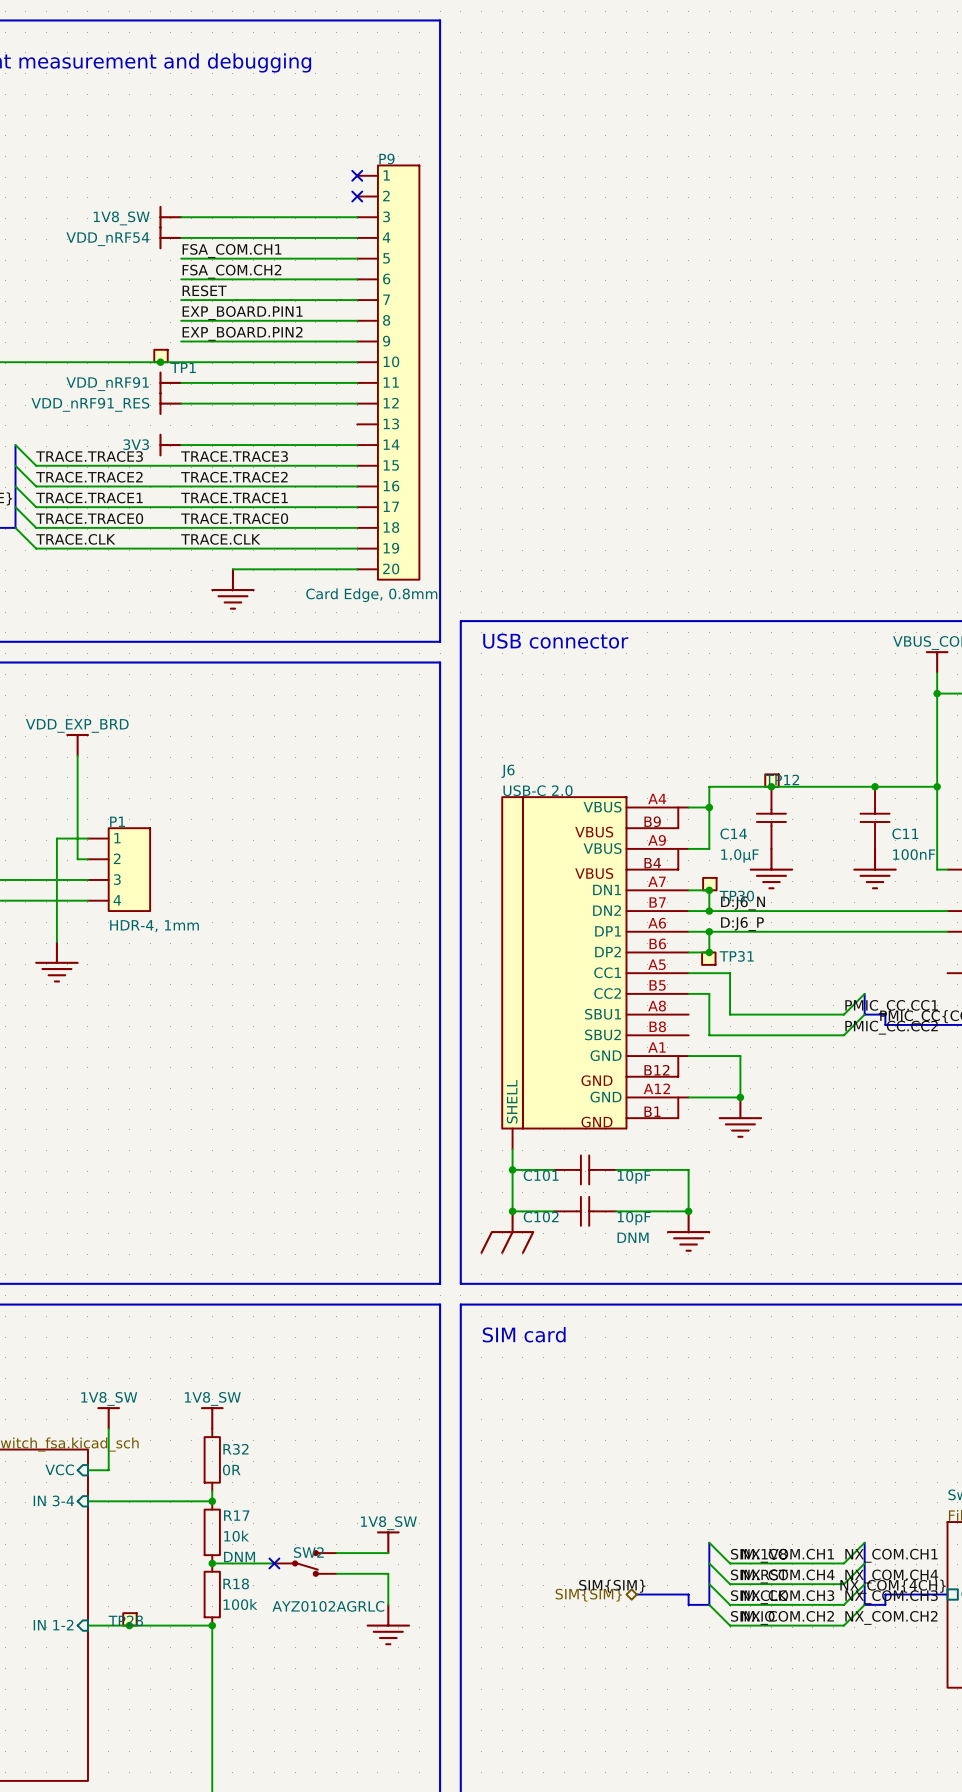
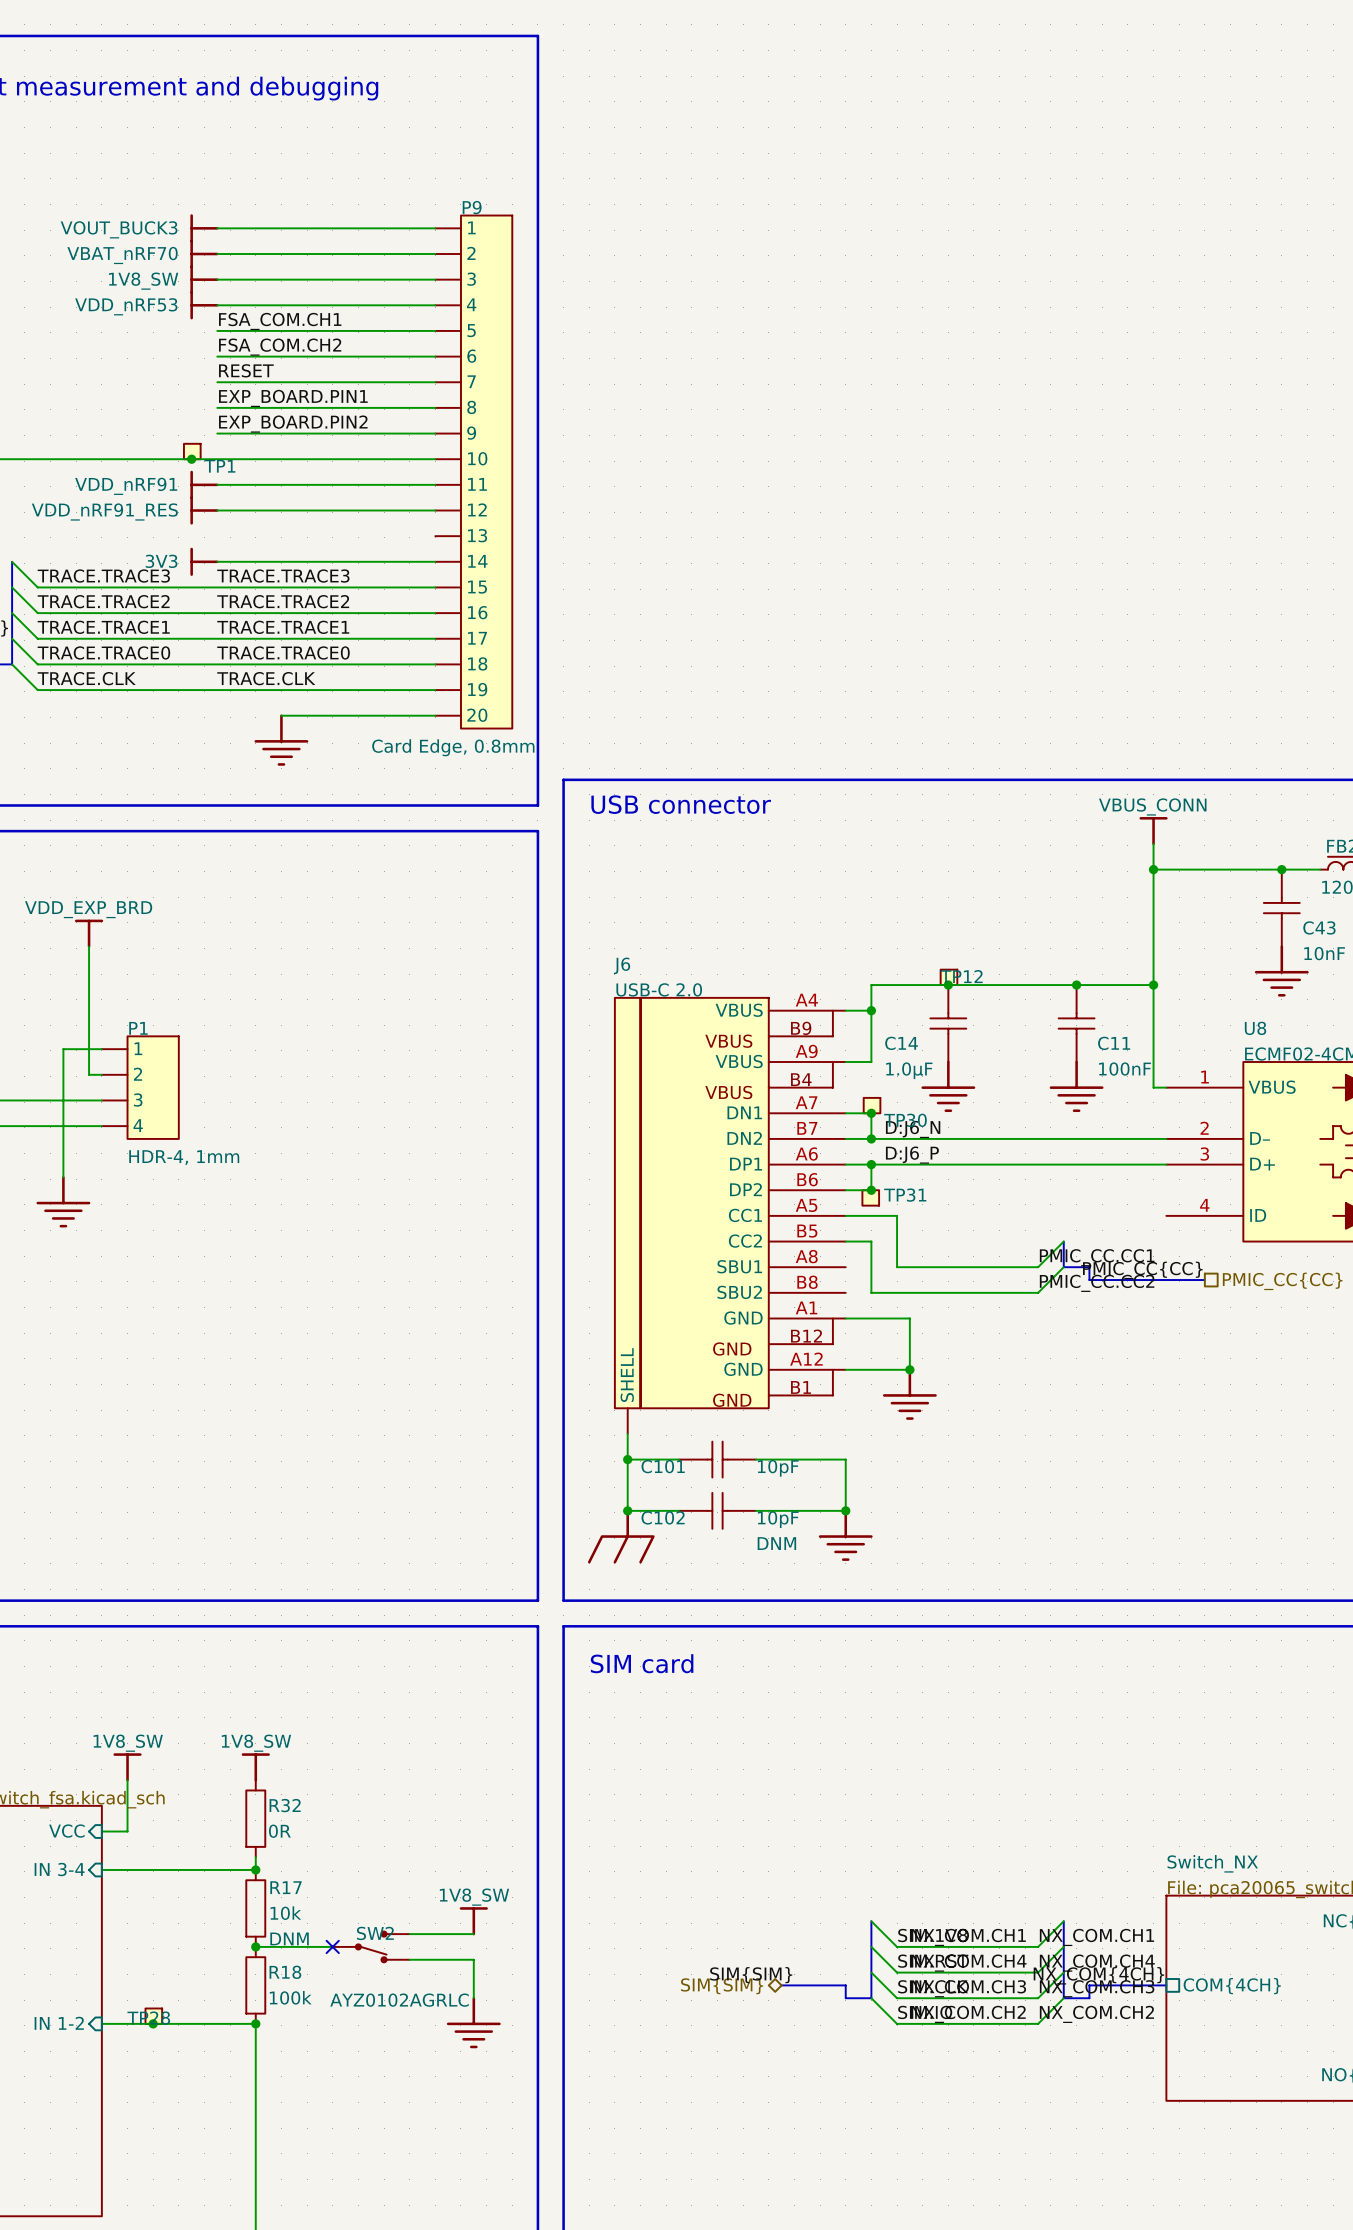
power symbol: none -> VOUT_BUCK3 (204, 228)
wire: none -> (217, 228) (435, 228)
no-connect mark: (357, 175) -> none
power symbol: none -> VBAT_nRF70 (204, 254)
wire: none -> (217, 254) (435, 254)
no-connect mark: (357, 196) -> none
power symbol: VDD_nRF54 (170, 237) -> VDD_nRF53 (204, 305)

